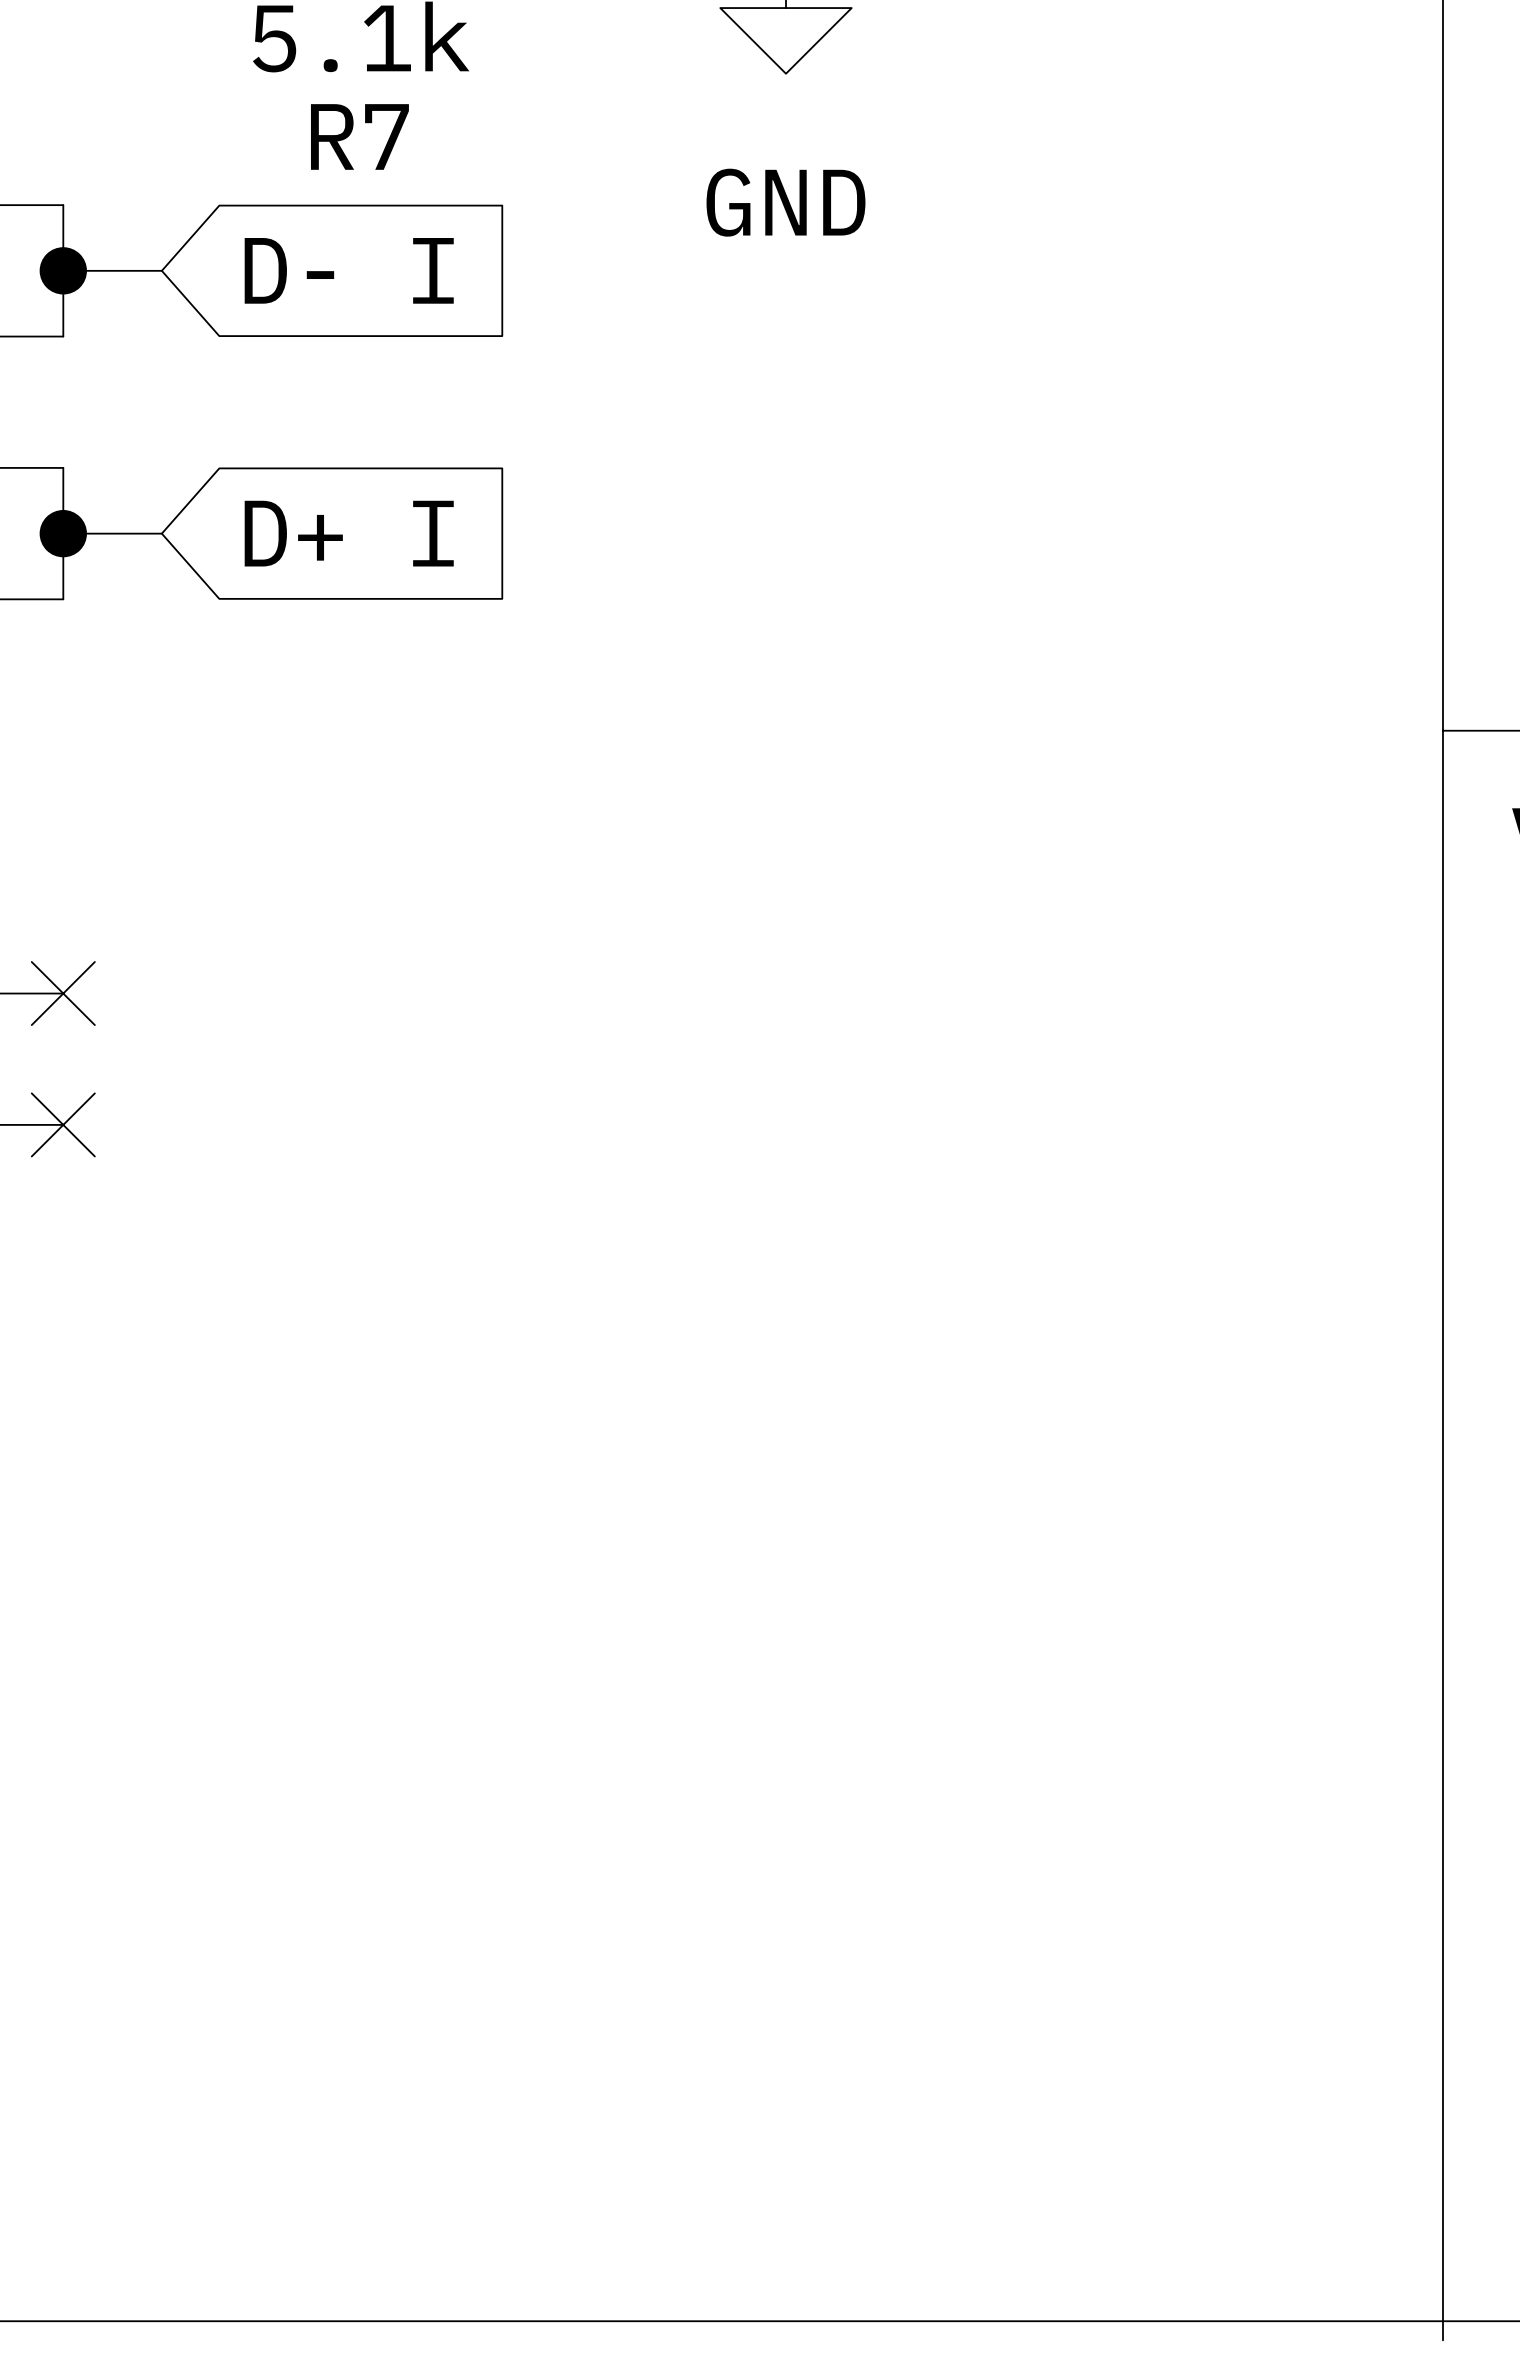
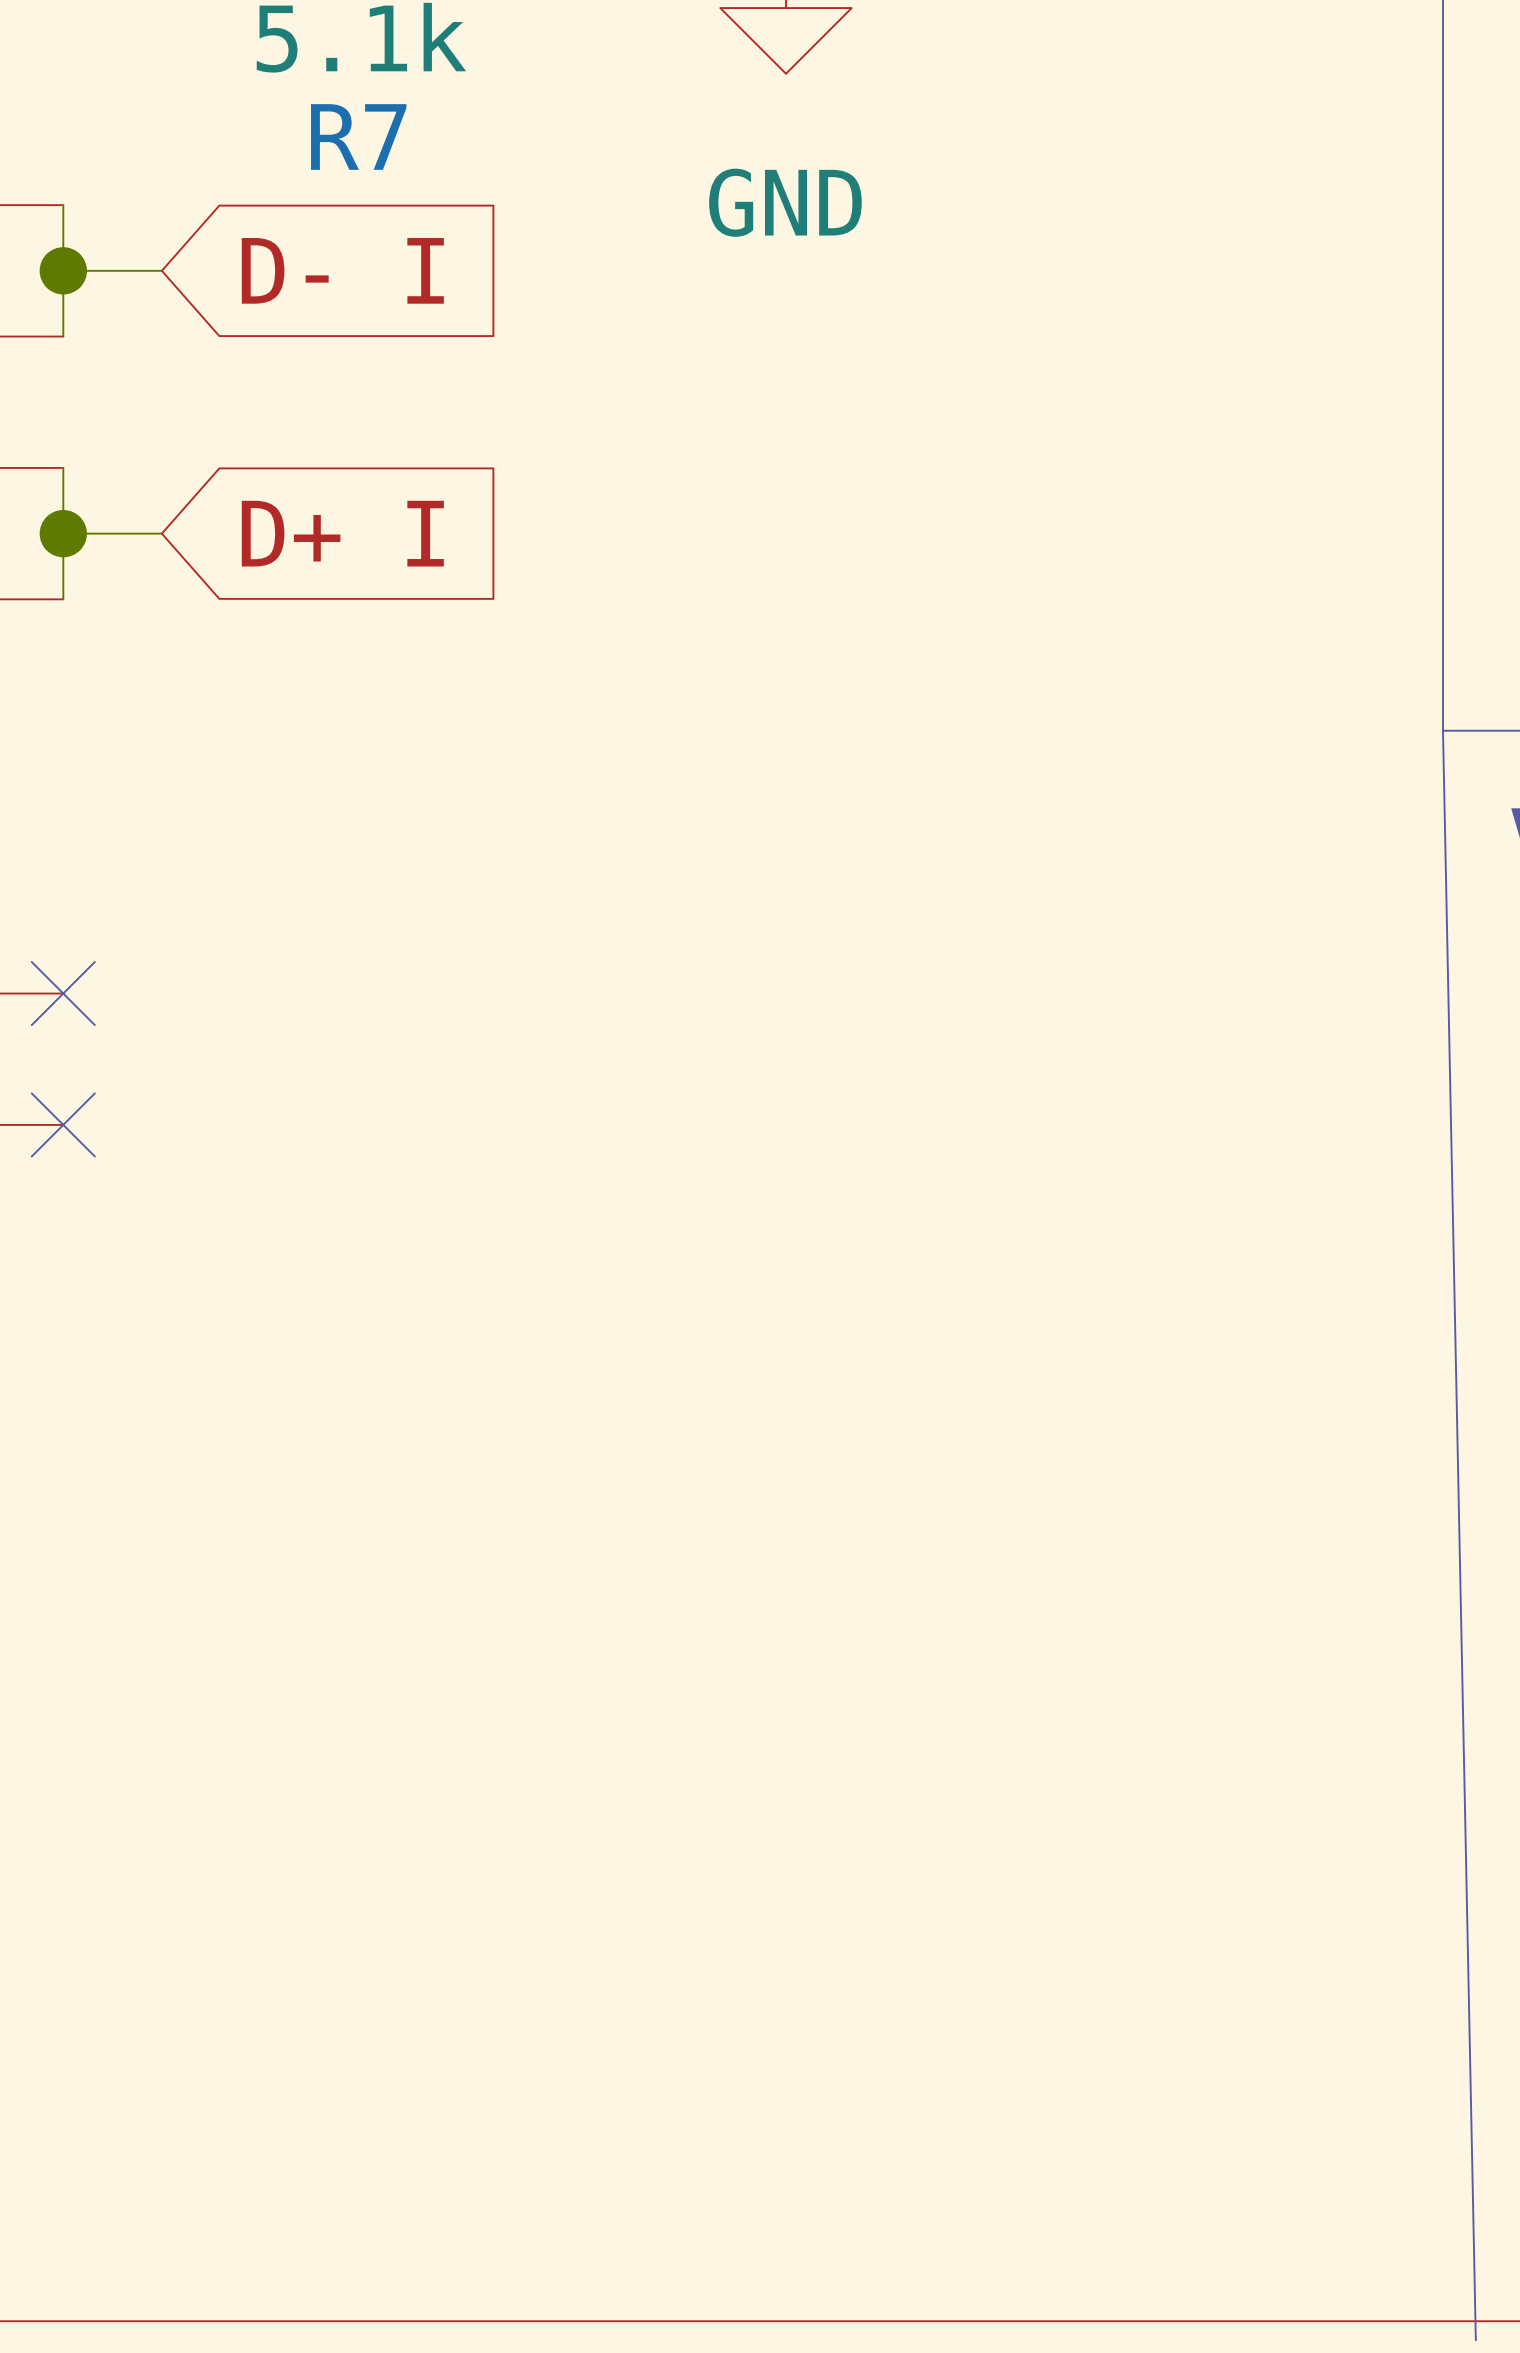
line: (1442, 730) (1442, 2340) -> (1442, 730) (1475, 2340)

